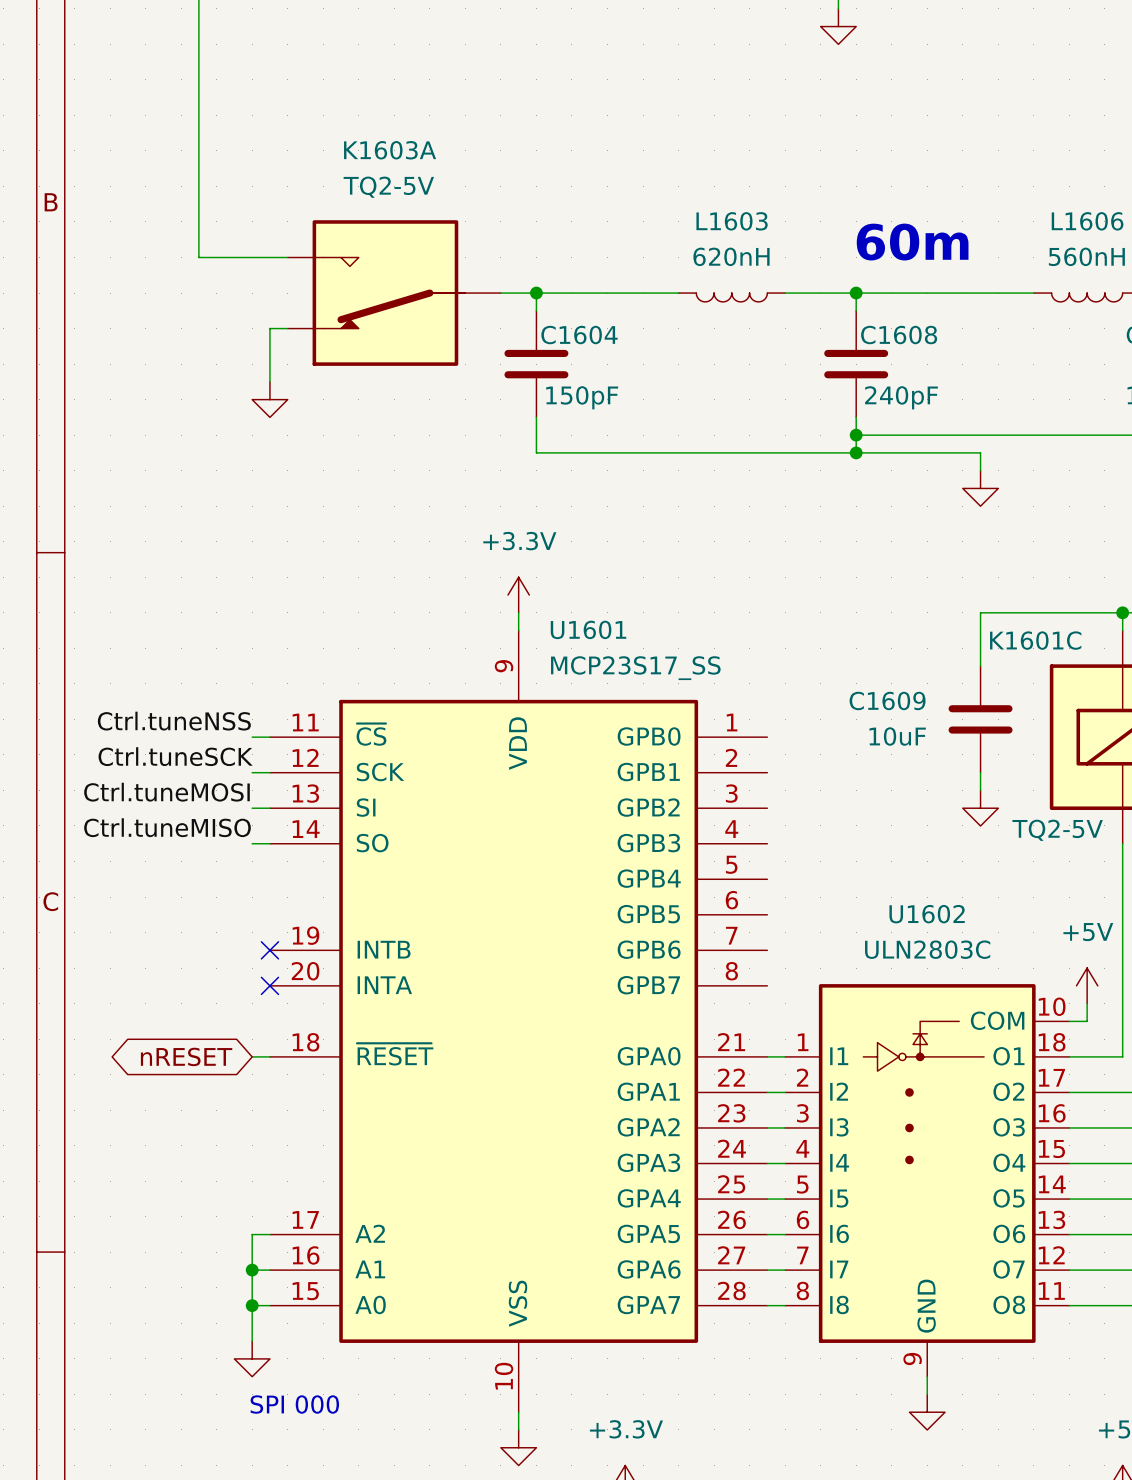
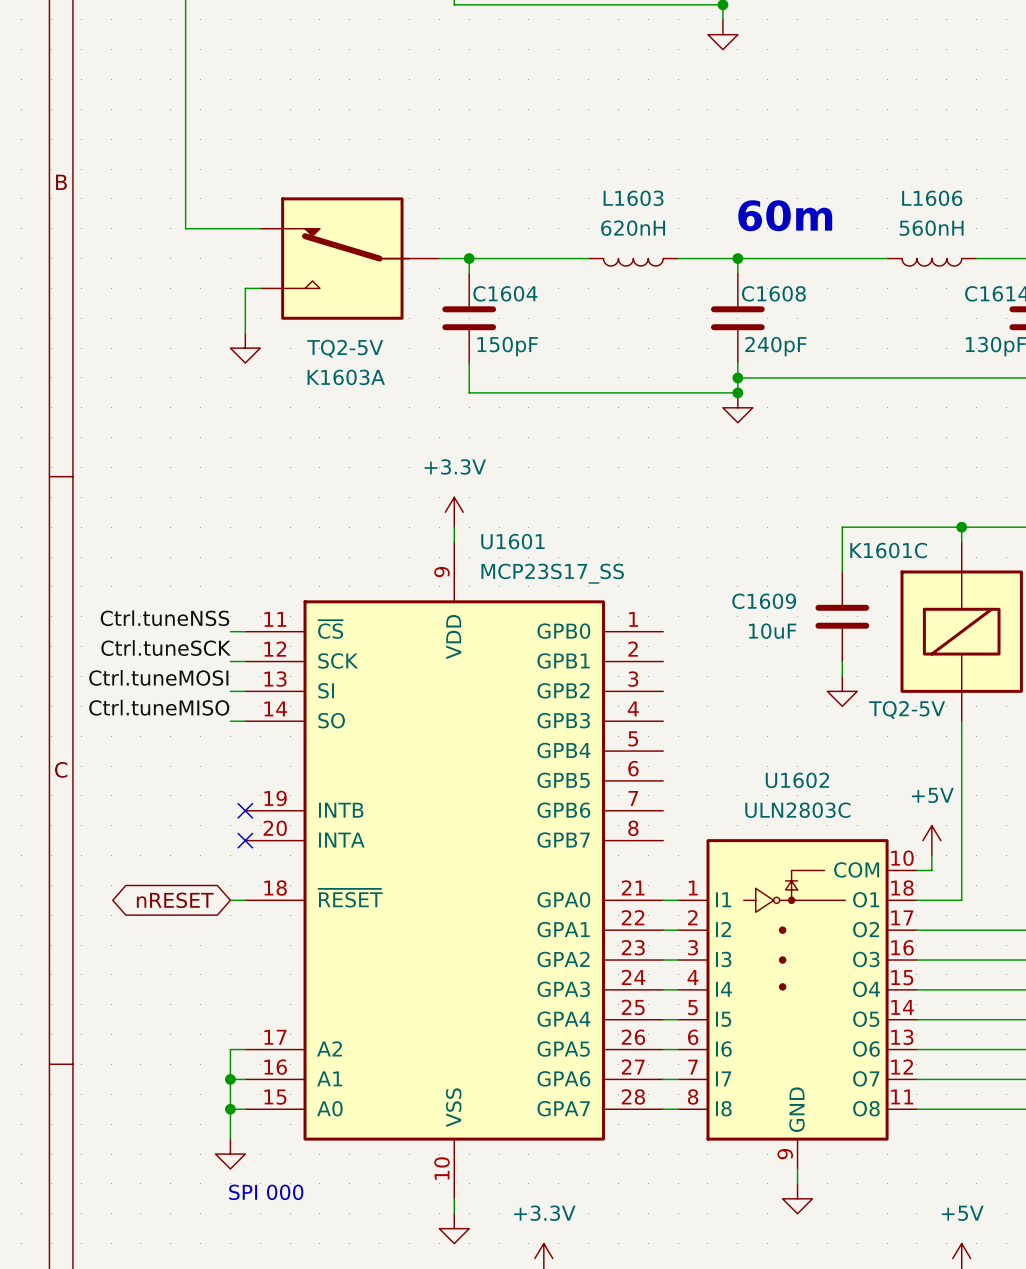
K1603A flip: as is (388, 293) -> up-down (345, 258)
wire: (856, 452) (980, 452) (980, 470) -> none
power symbol position: (980, 488) -> (737, 407)

